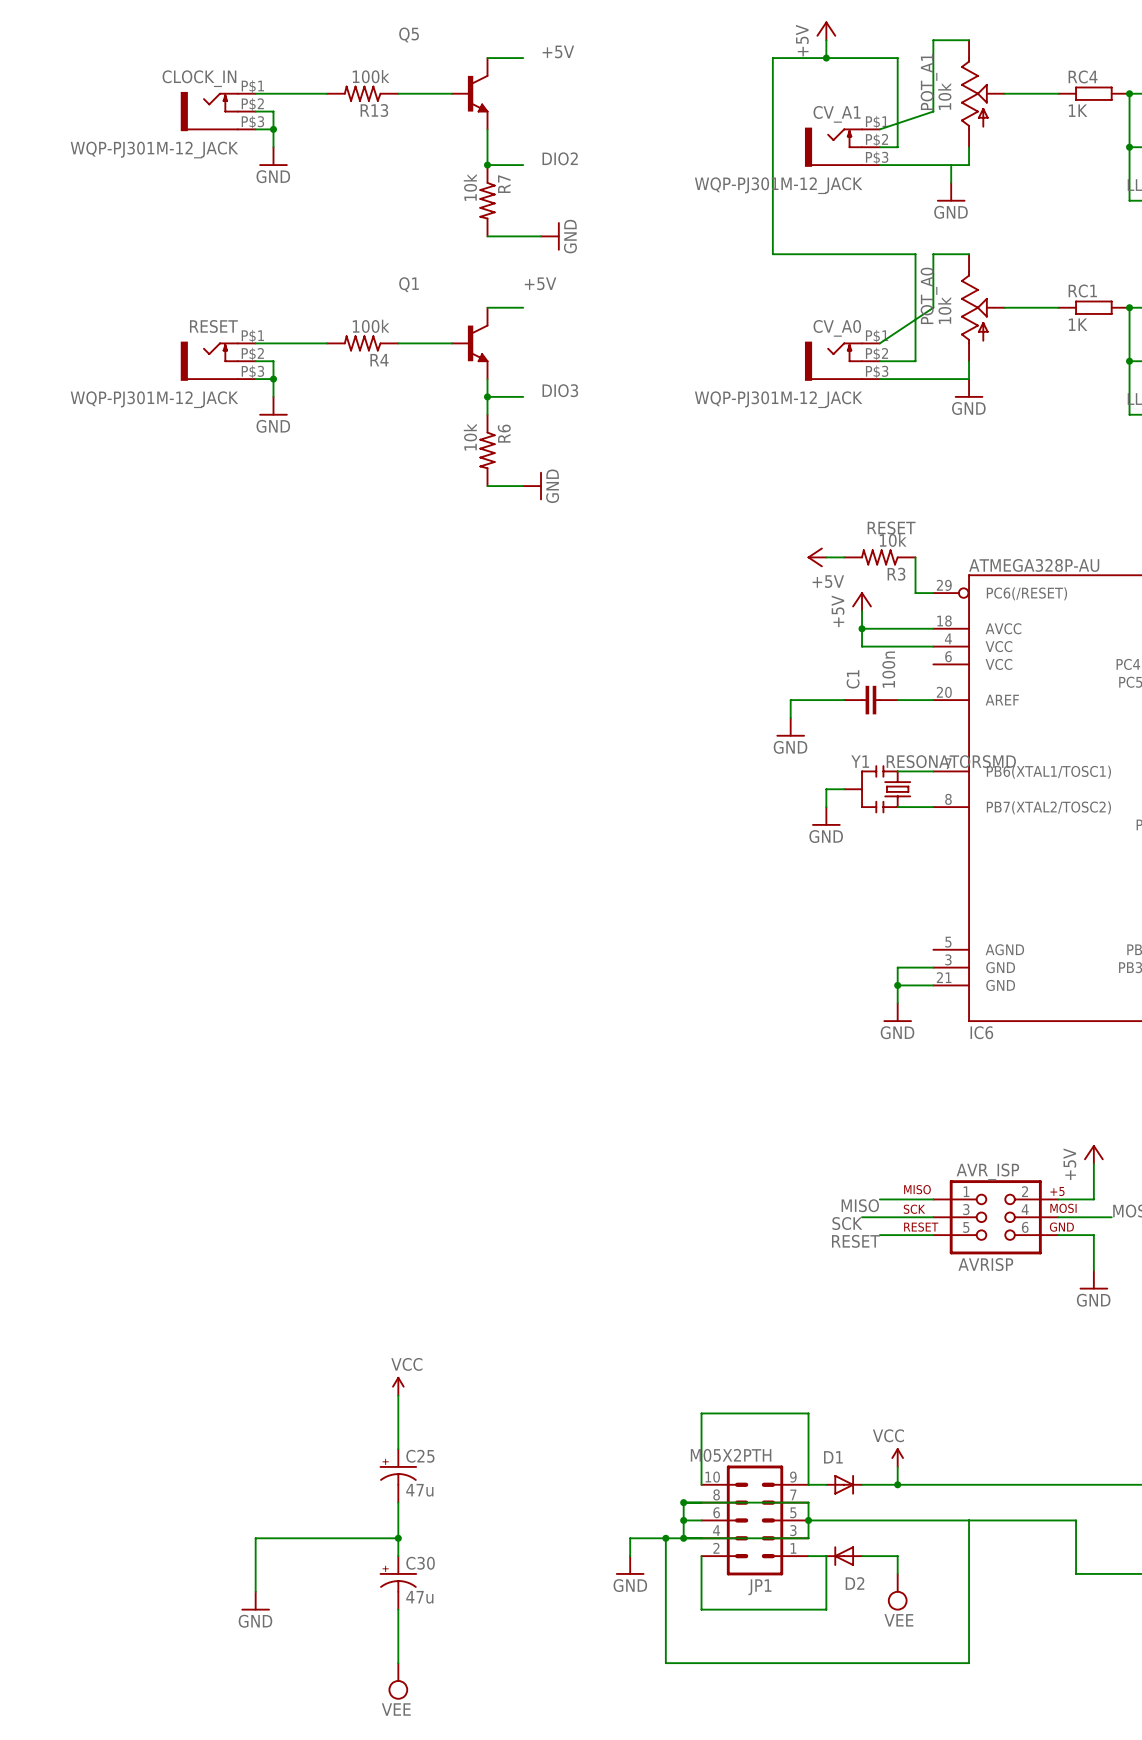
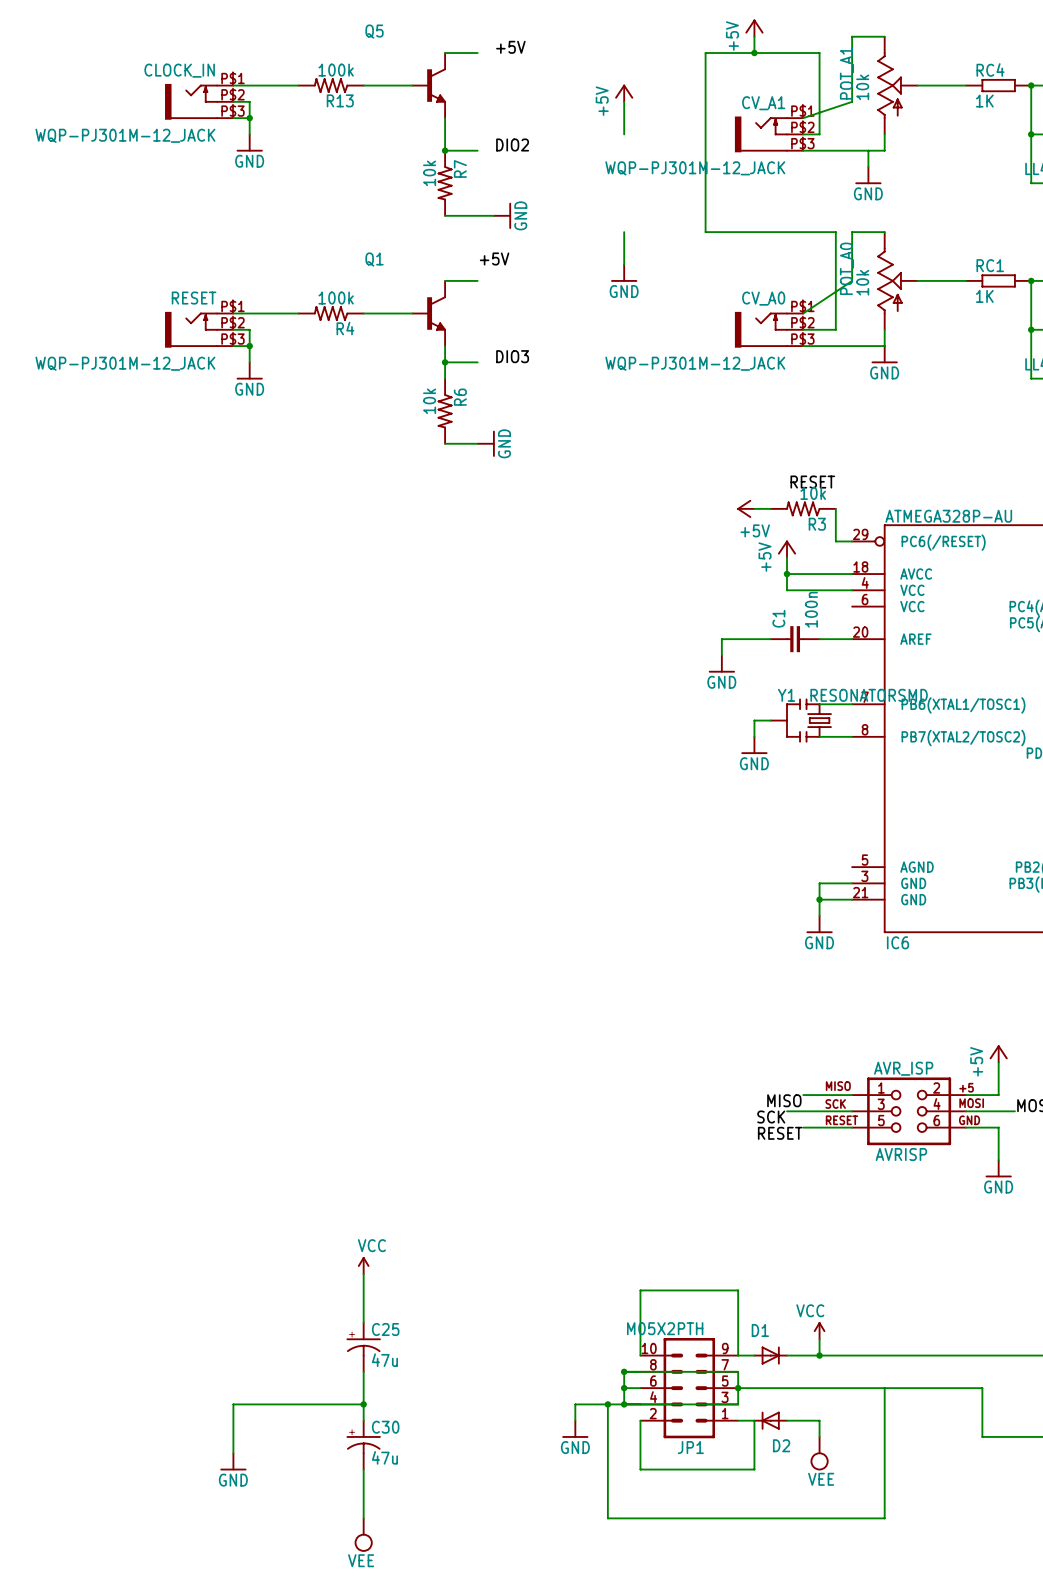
power symbol: none -> +5V (624, 93)
wire: none -> (624, 101) (624, 134)
wire: none -> (624, 232) (624, 264)
power symbol: none -> GND (624, 273)

